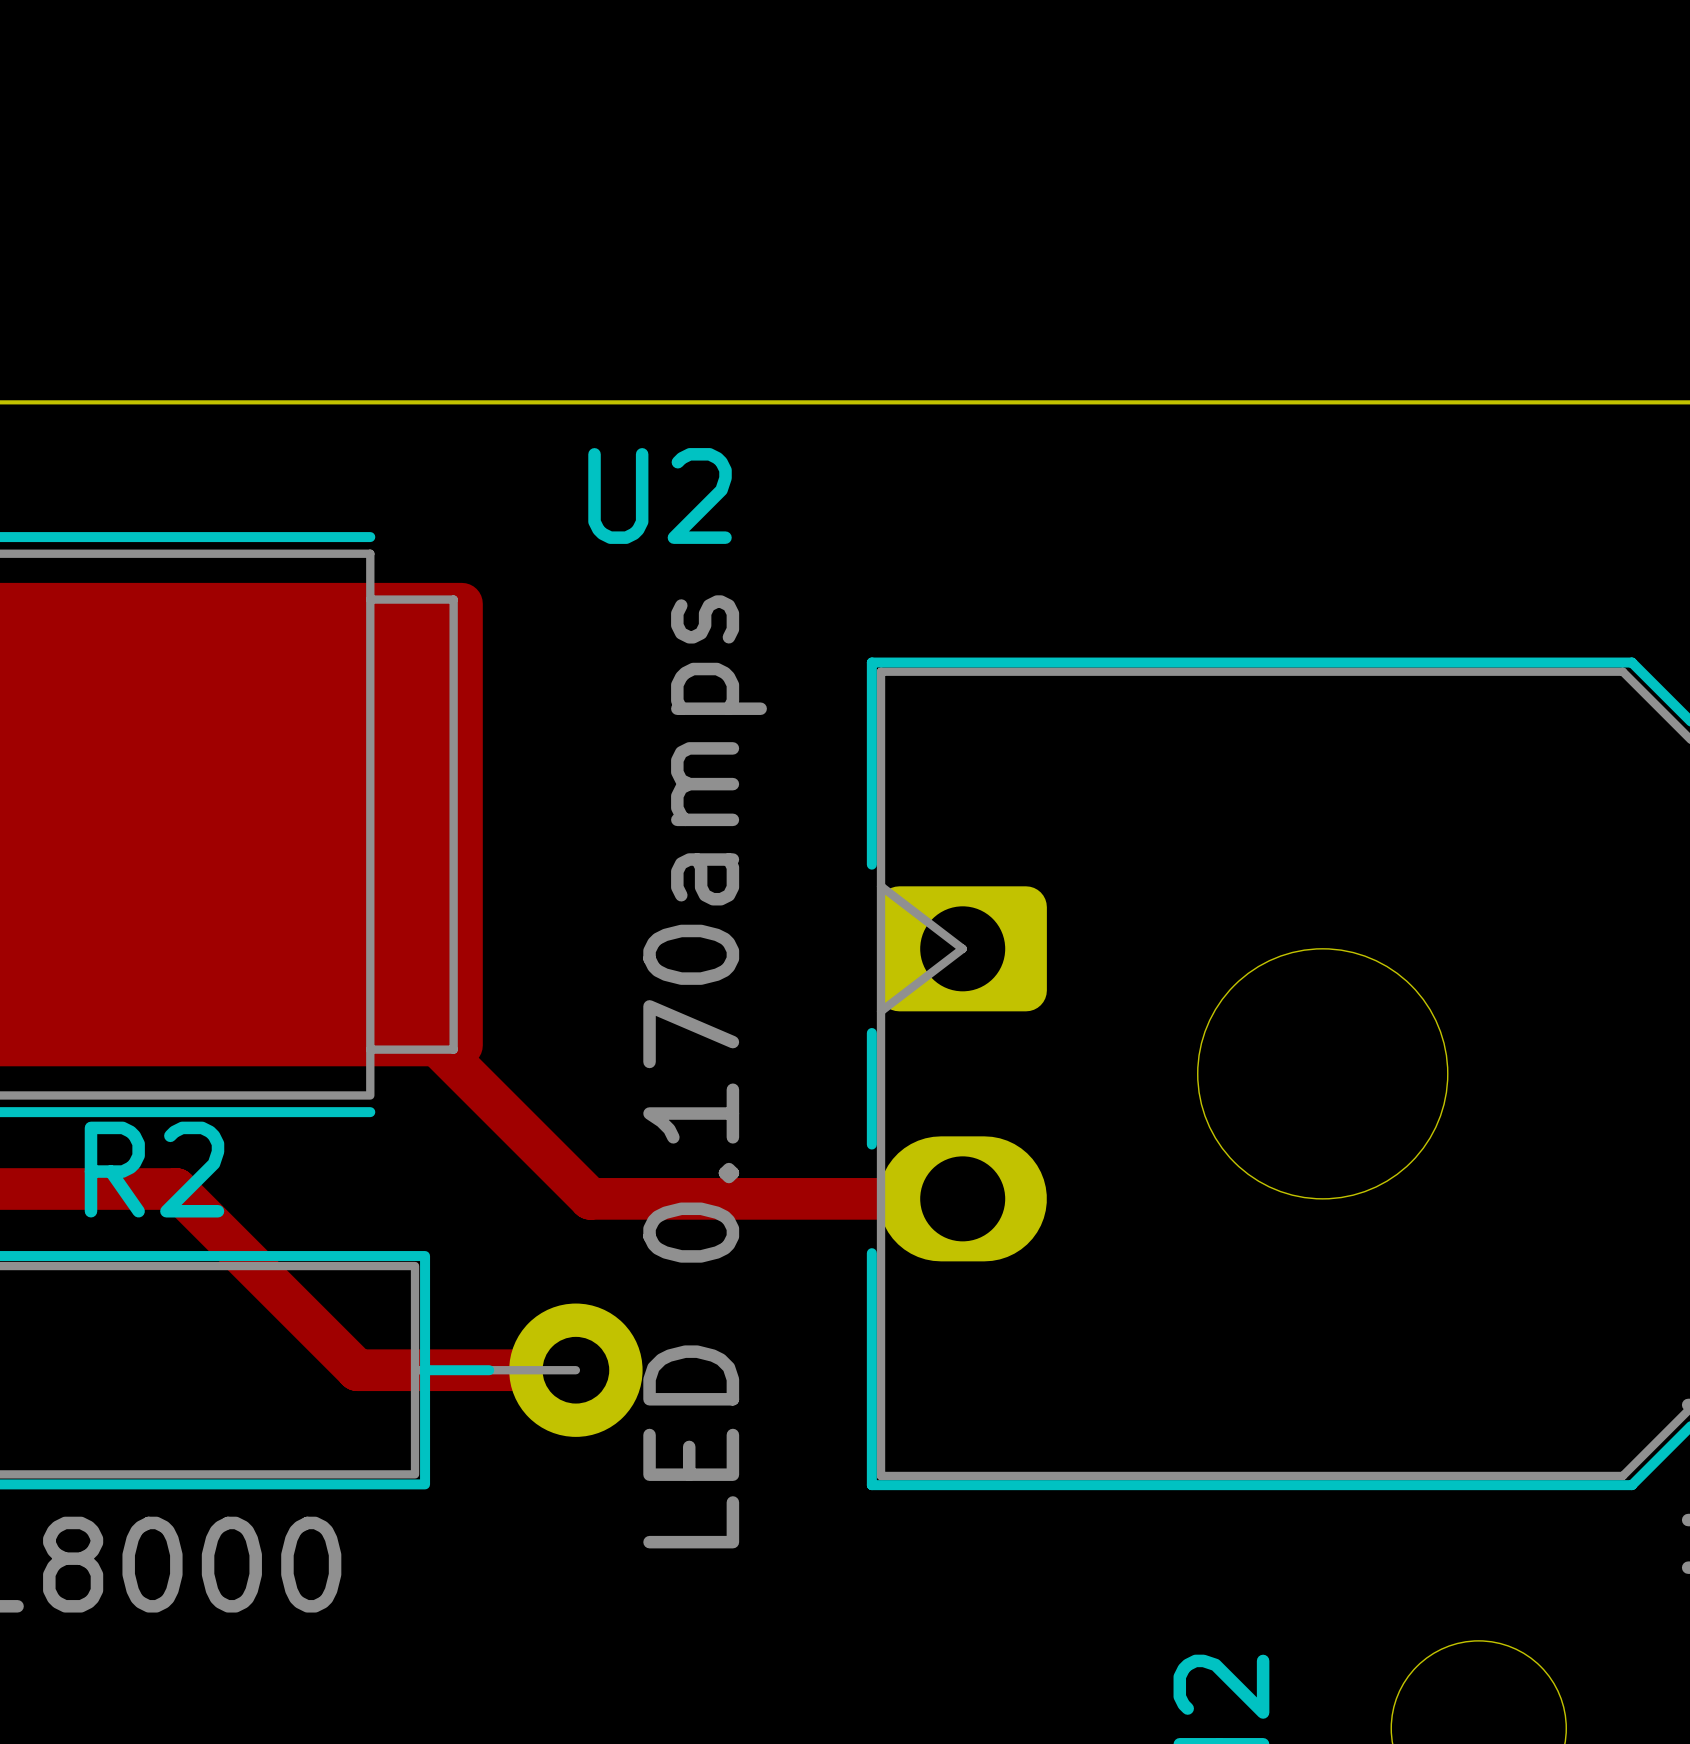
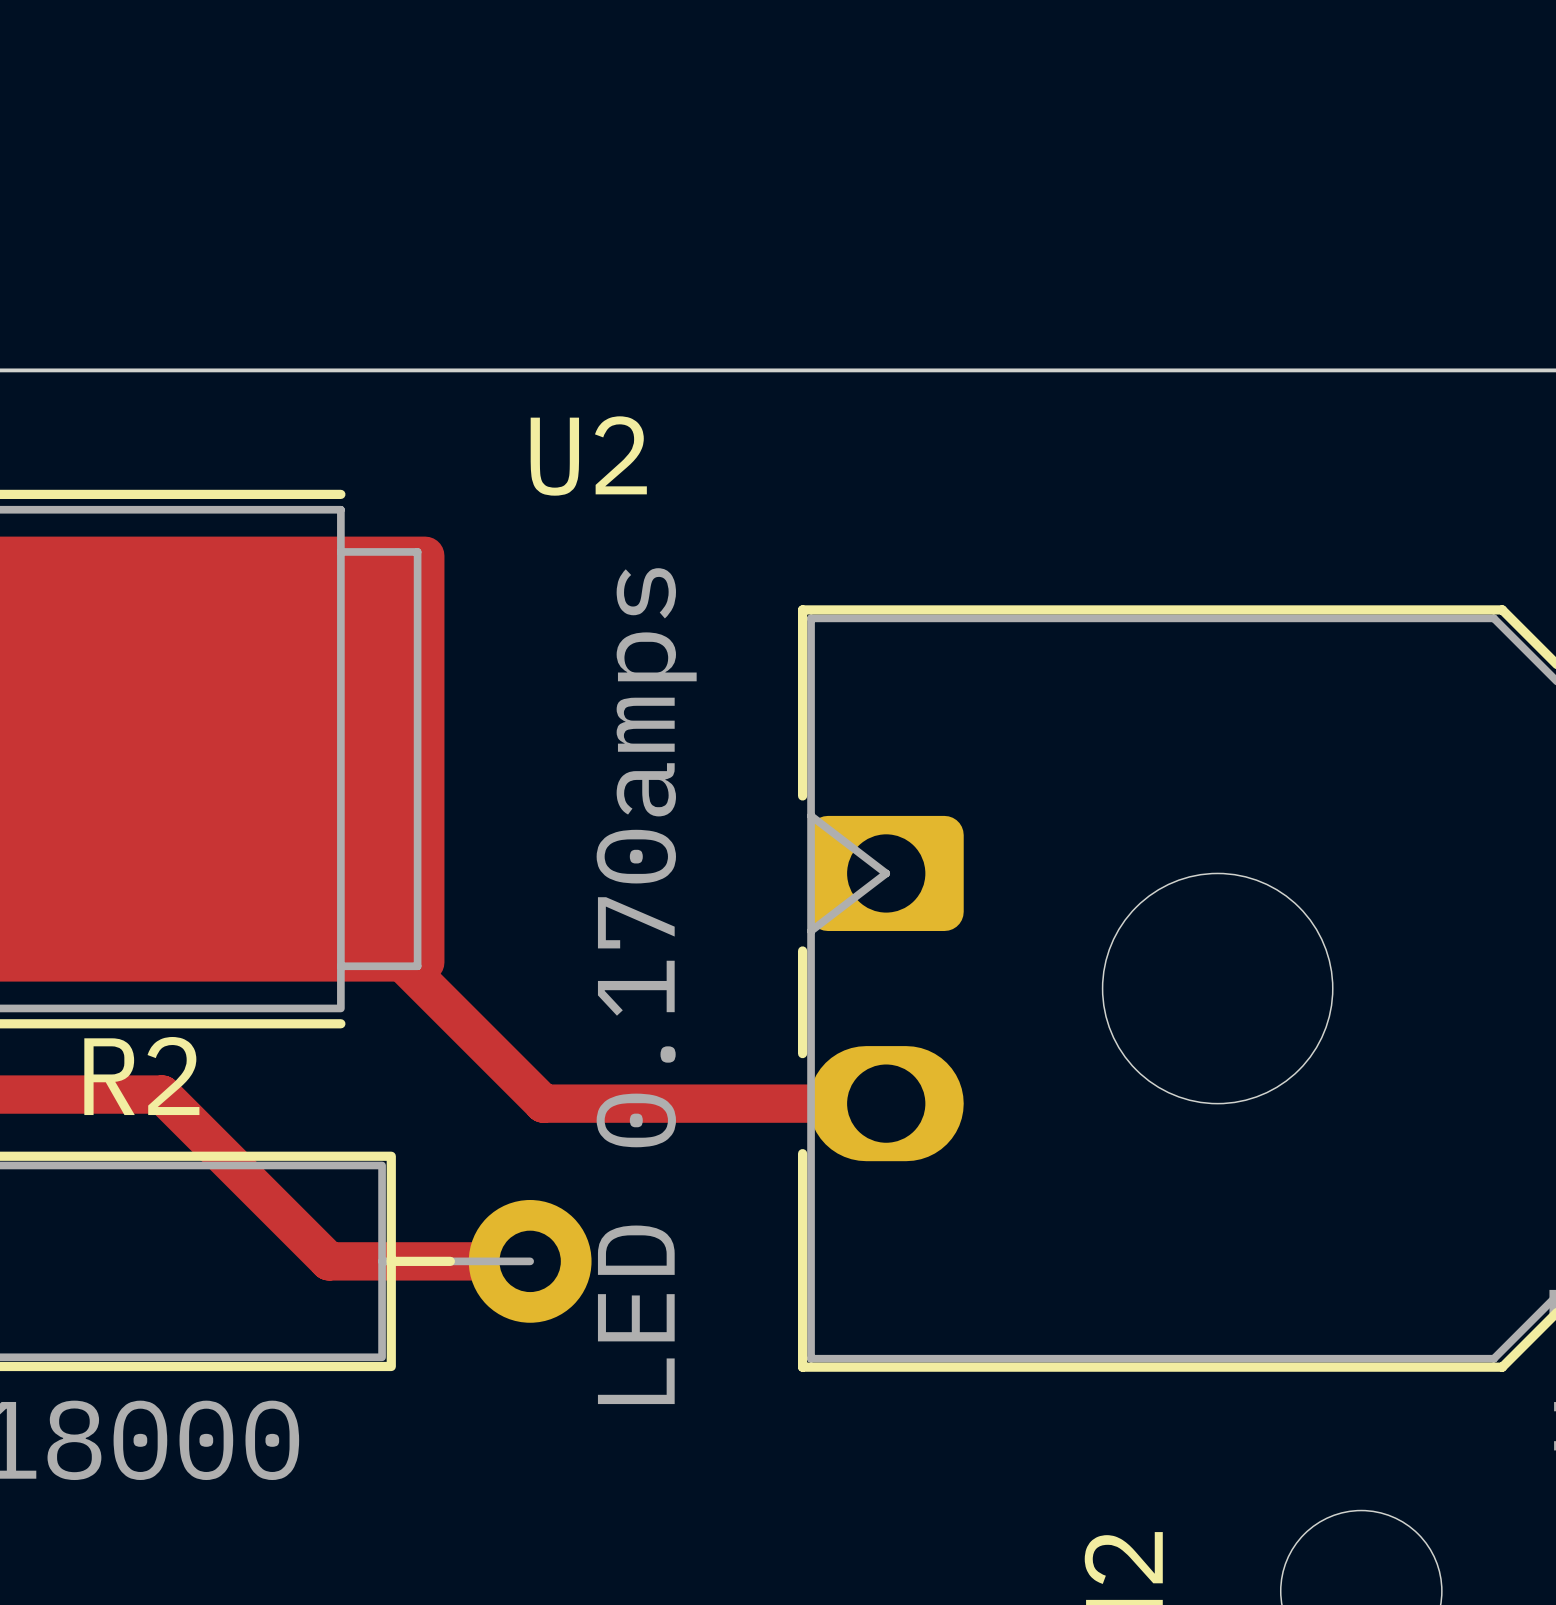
U2 name position: U2 (660, 495) -> U2 (588, 456)

